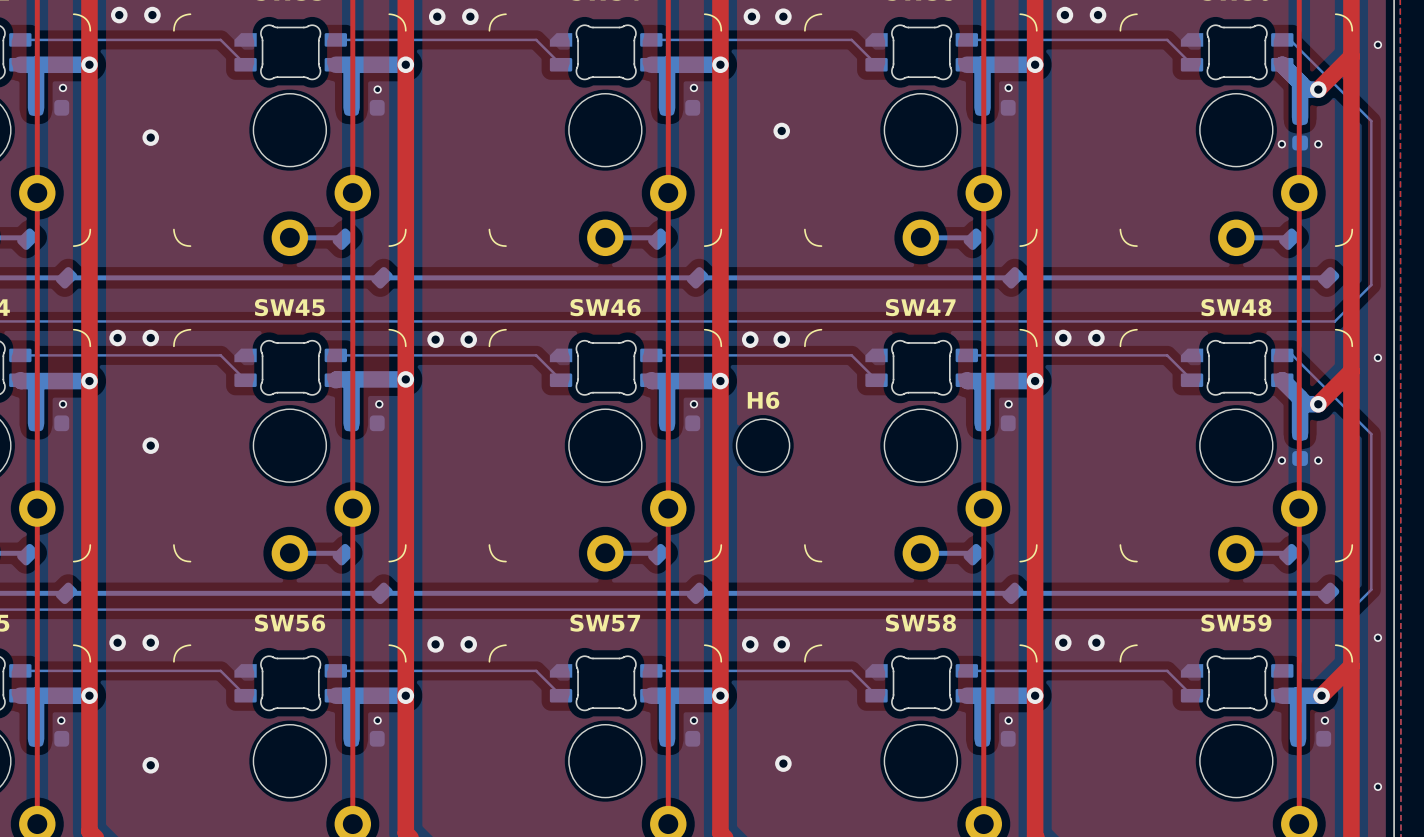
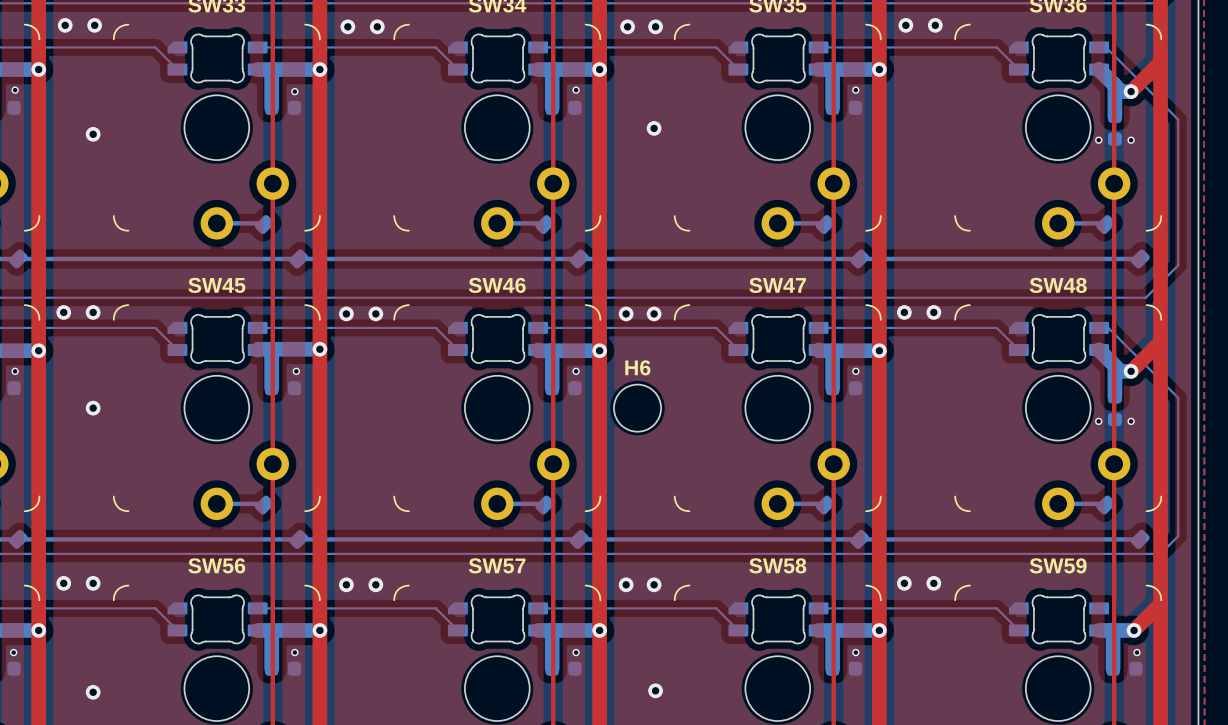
via: (1377, 44) -> none
via: (1377, 357) -> none
via: (1377, 637) -> none
via: (1377, 786) -> none

